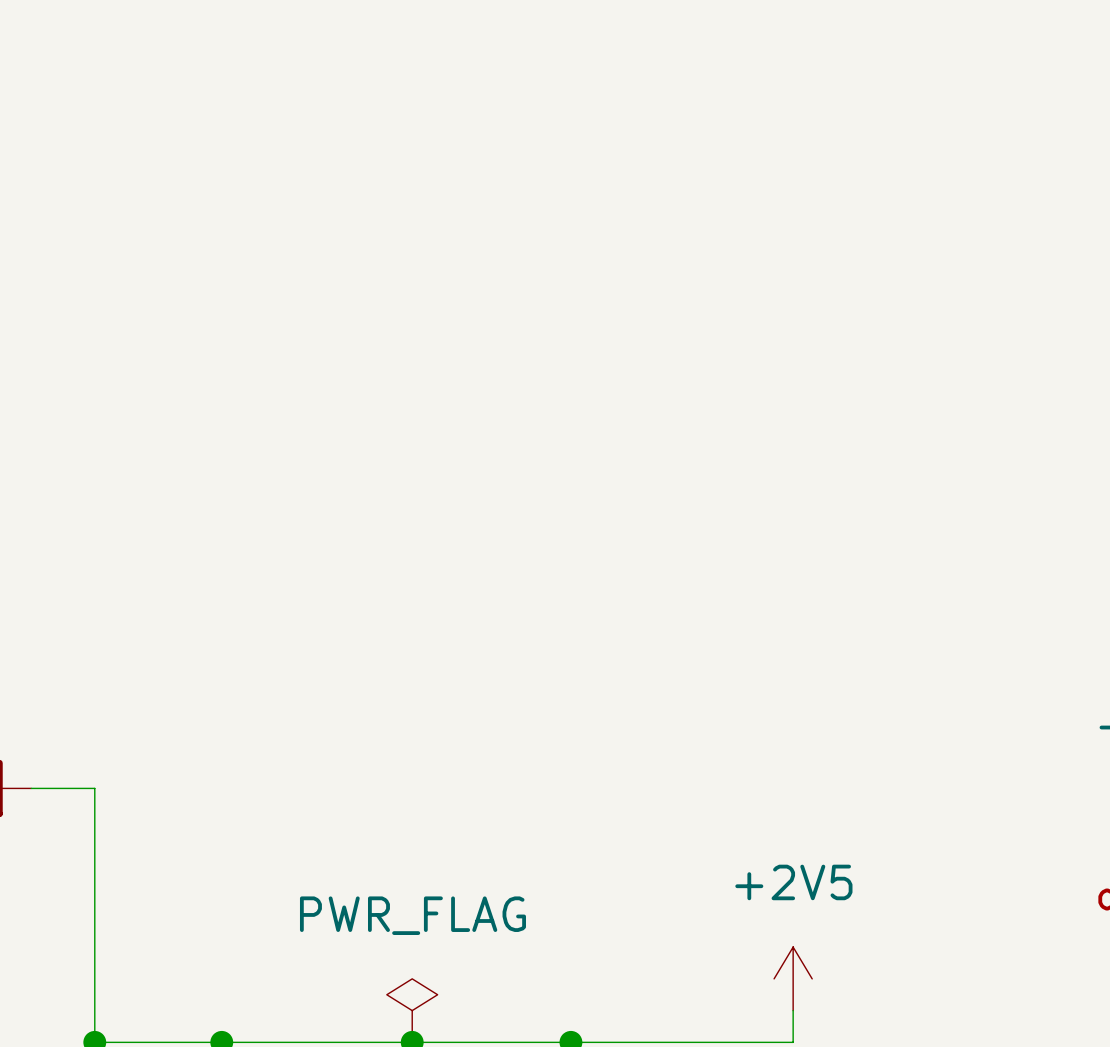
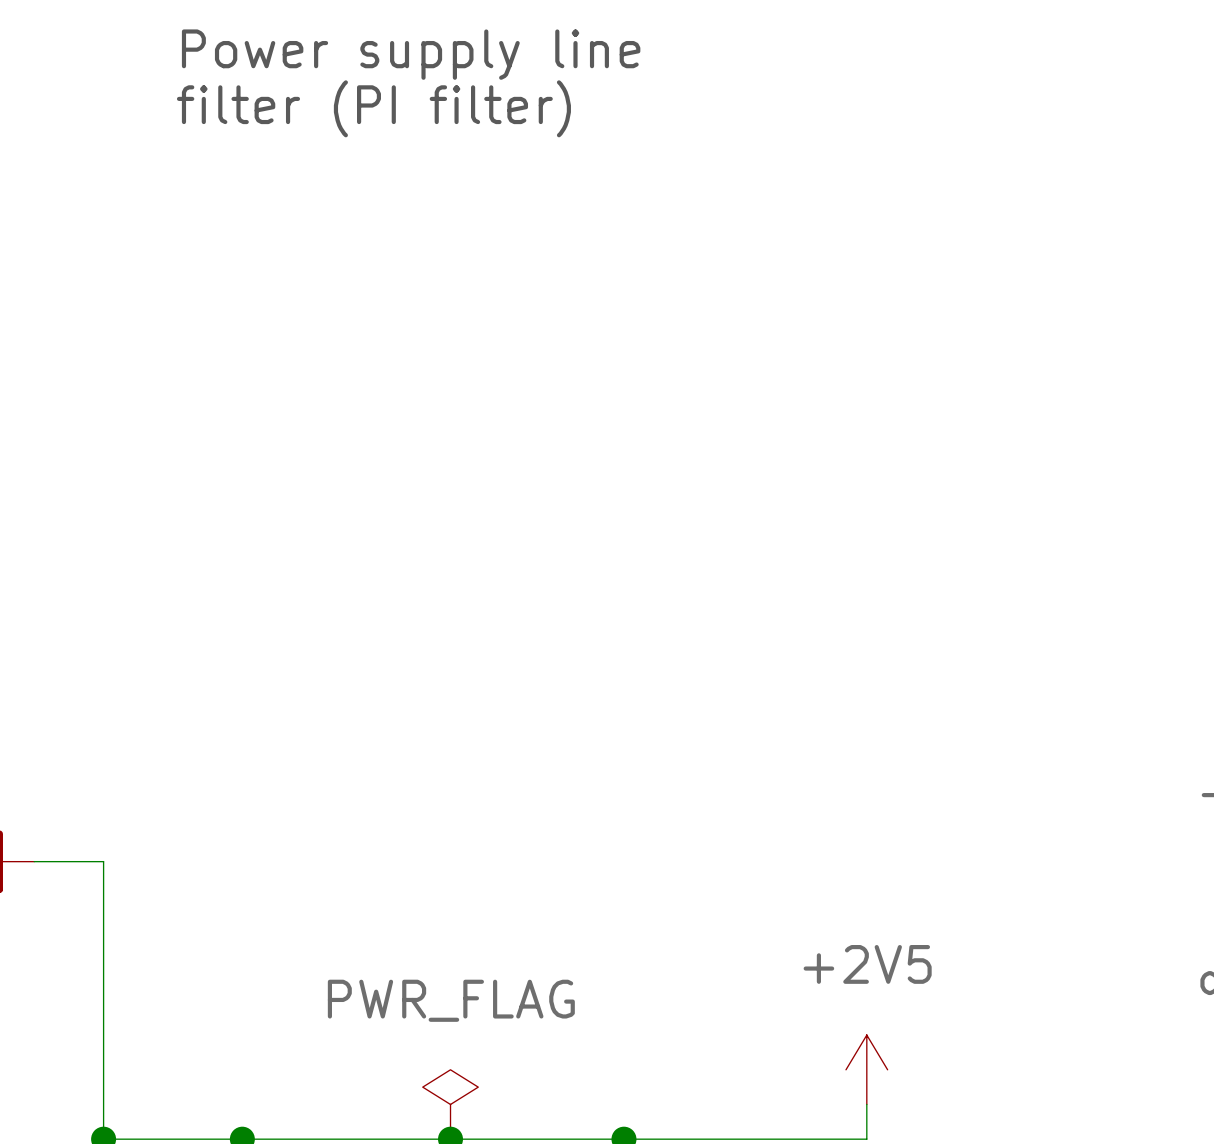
text: none -> Power supply line (411, 54)
text: none -> filter (PI filter) (373, 108)

